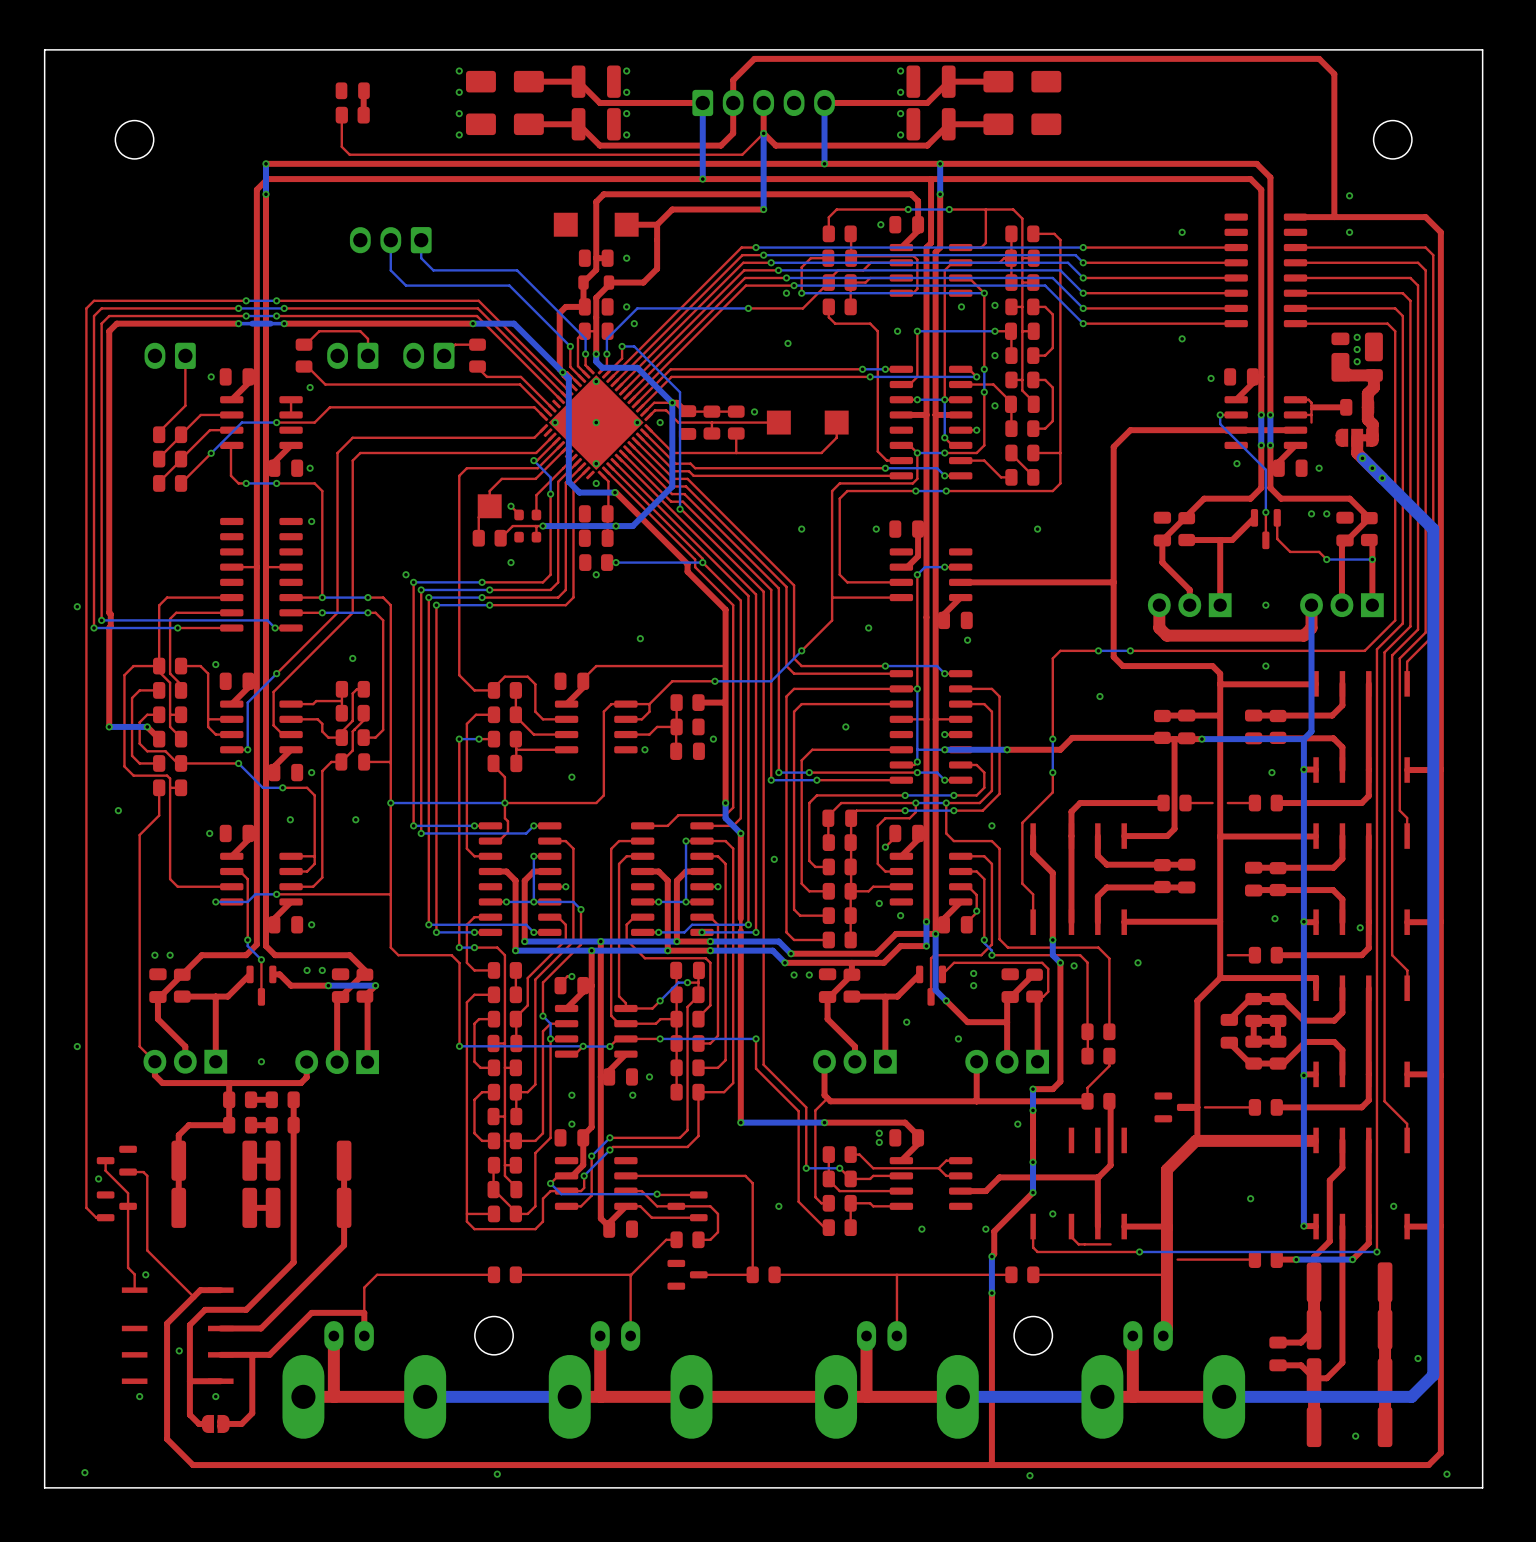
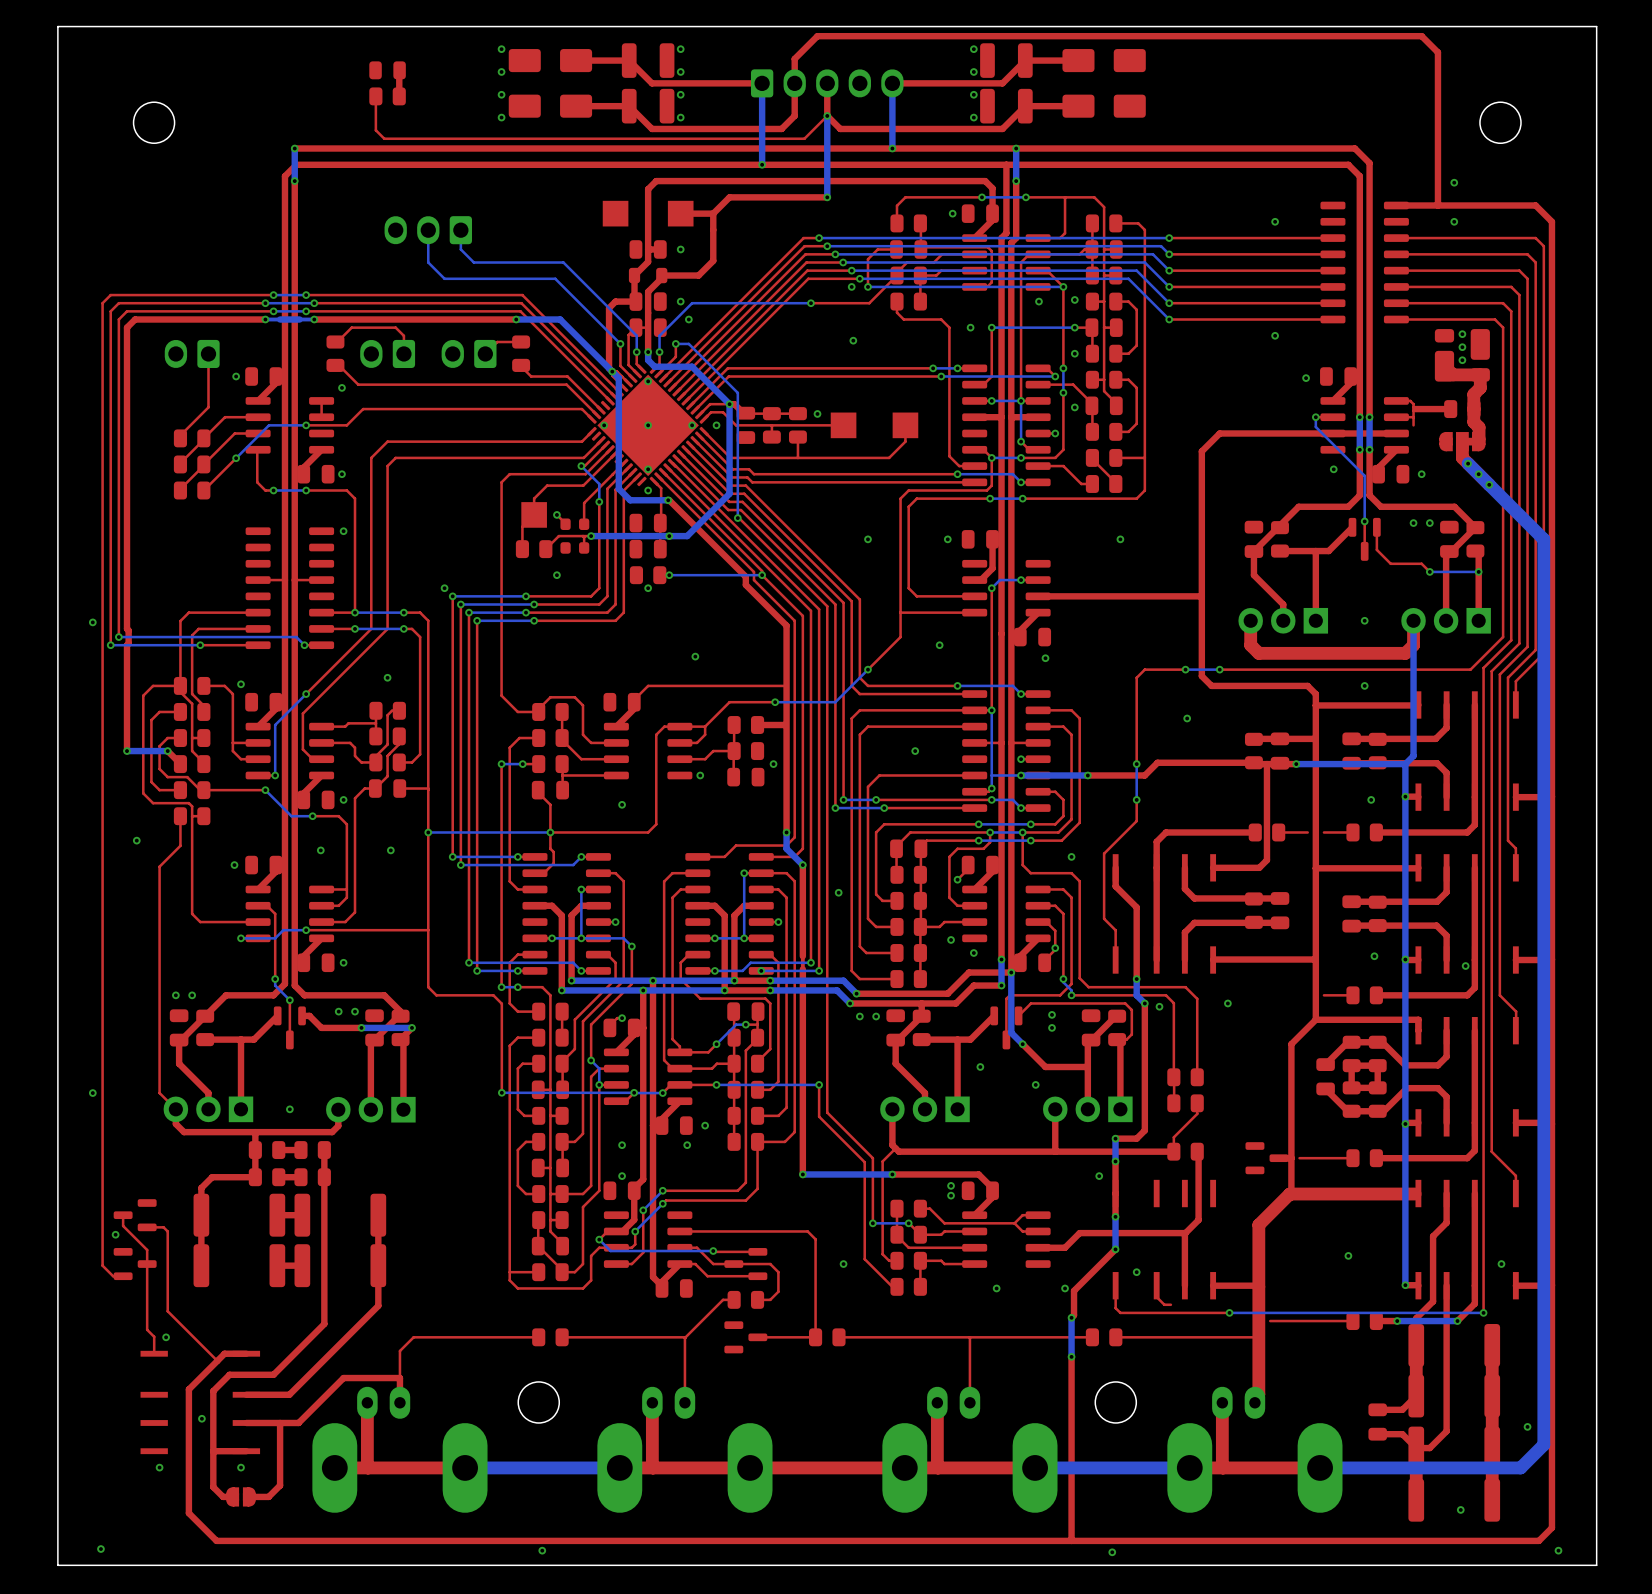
top track: (1110, 1244) (1084, 1244) -> none

